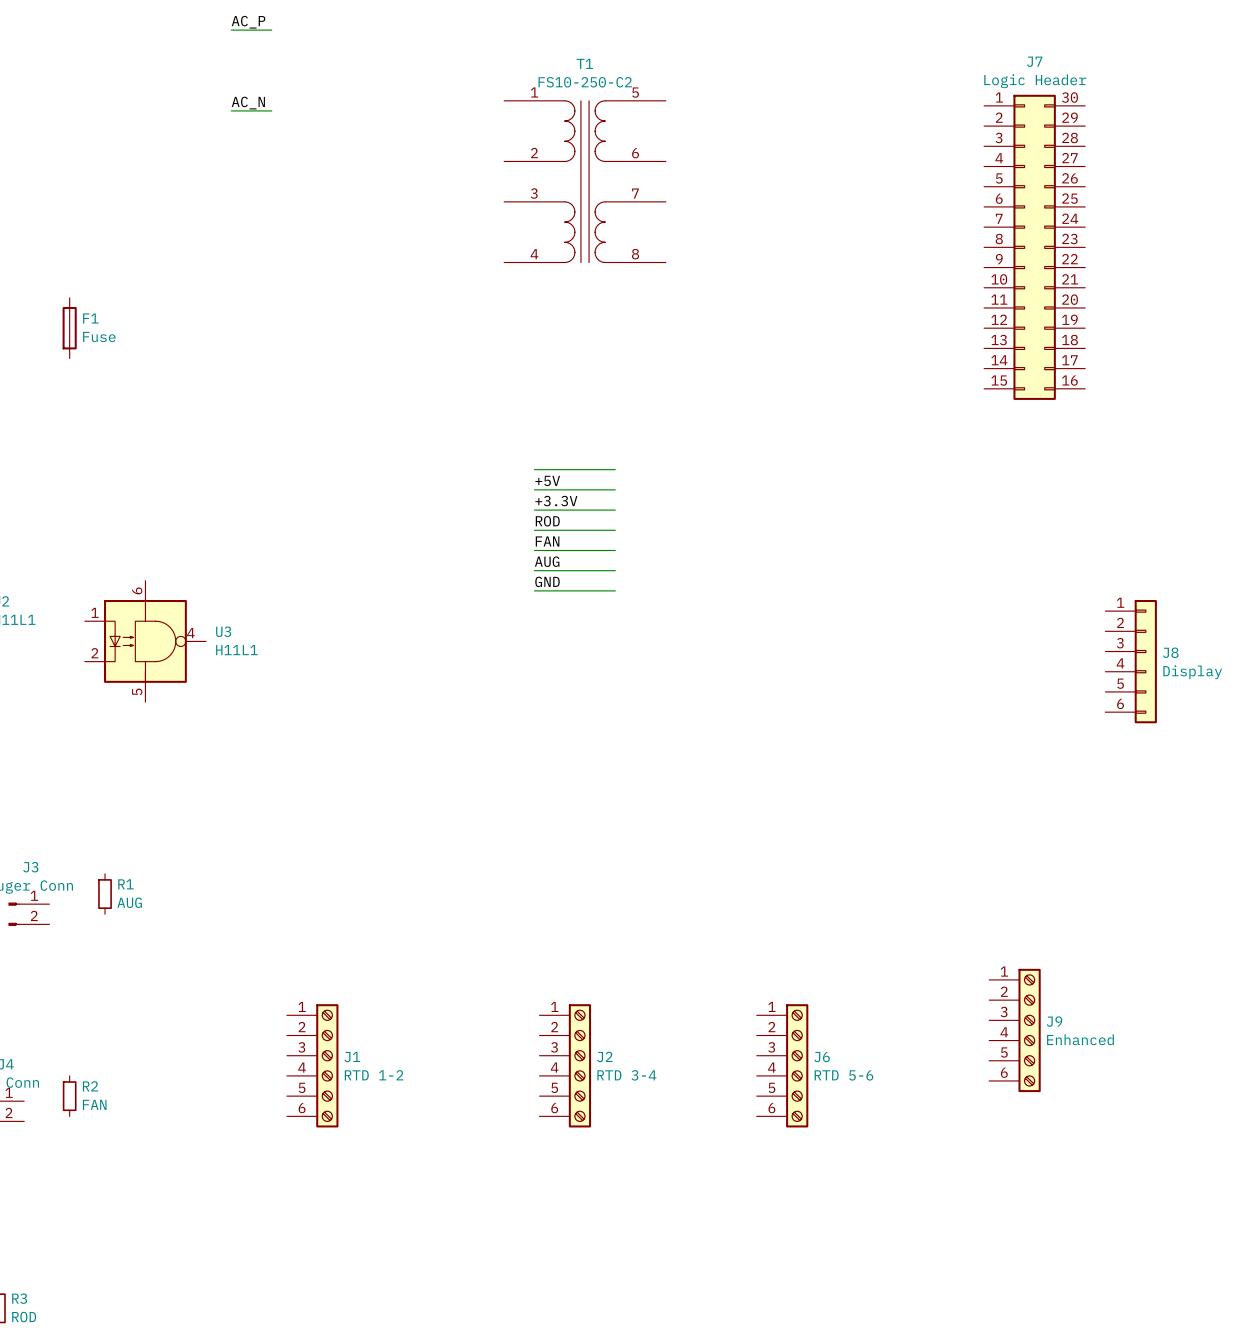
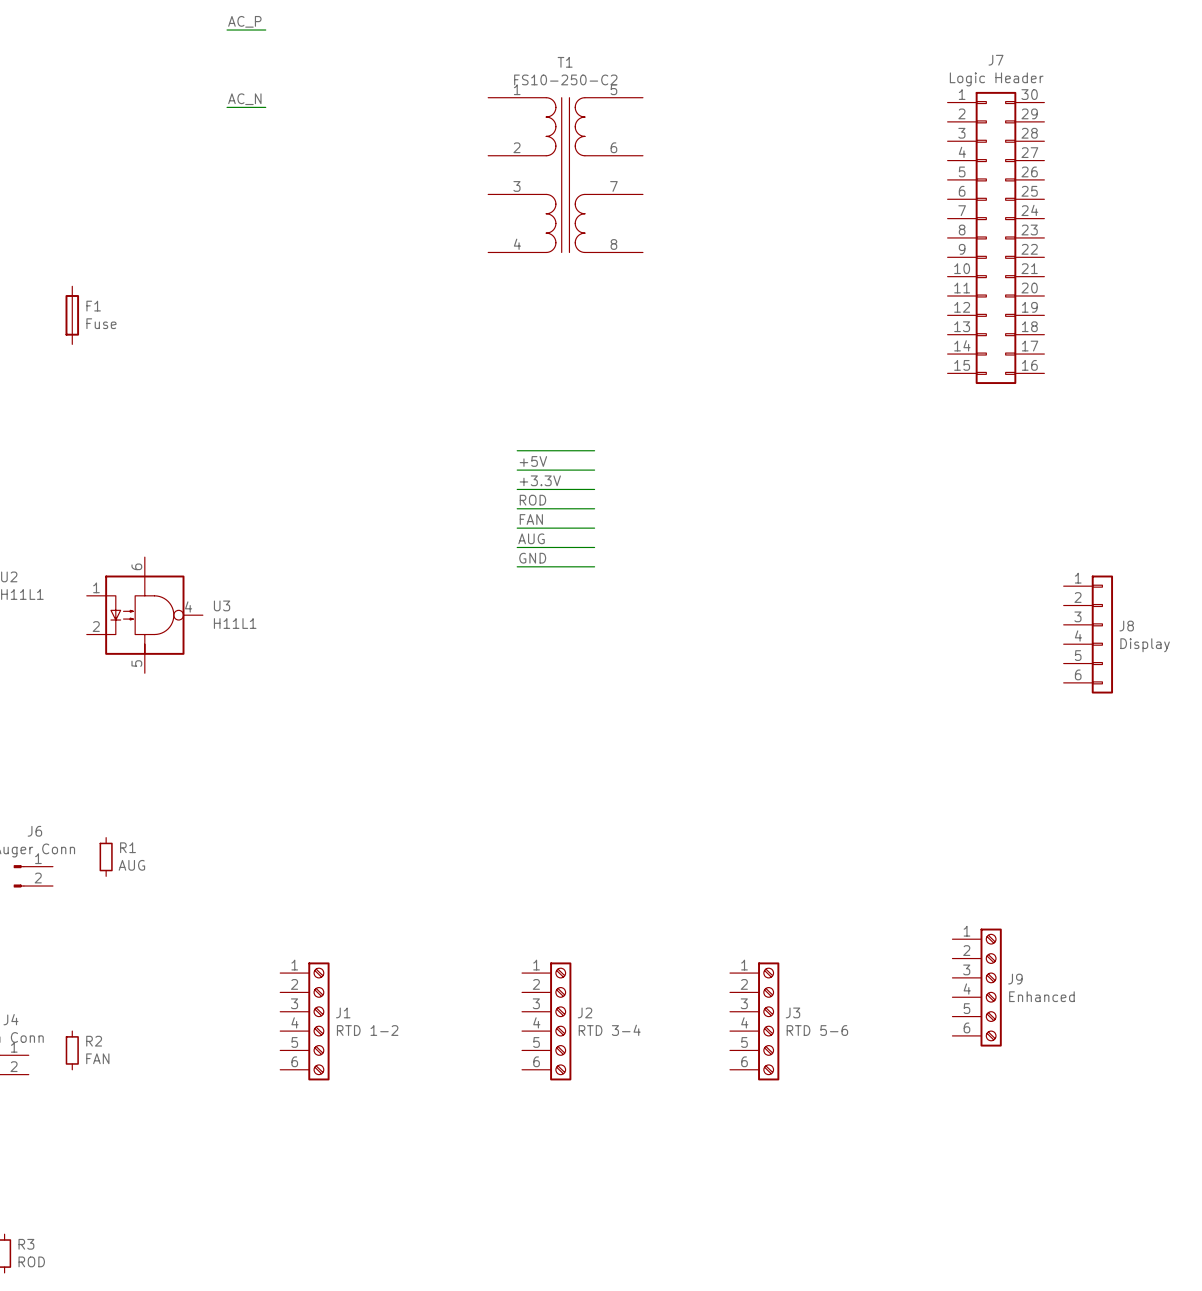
J3 name: J3 (30, 867) -> J6 (34, 831)
J6 name: J6 (822, 1057) -> J3 (792, 1012)

